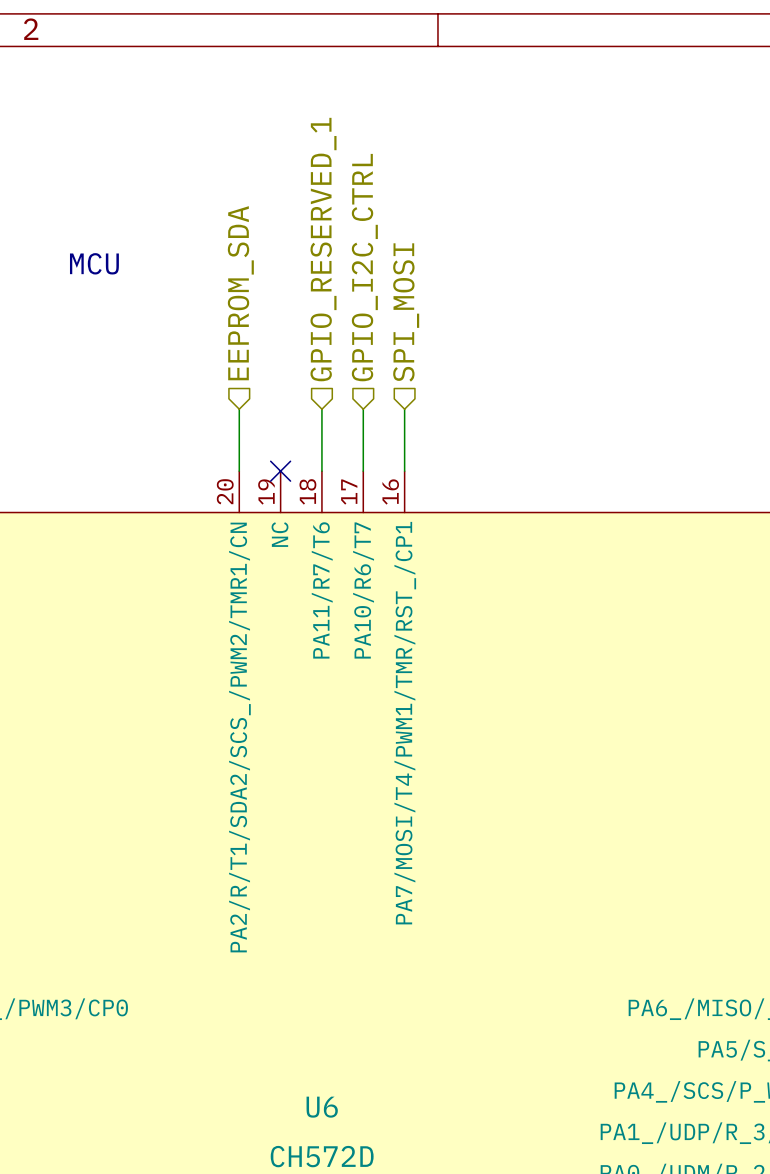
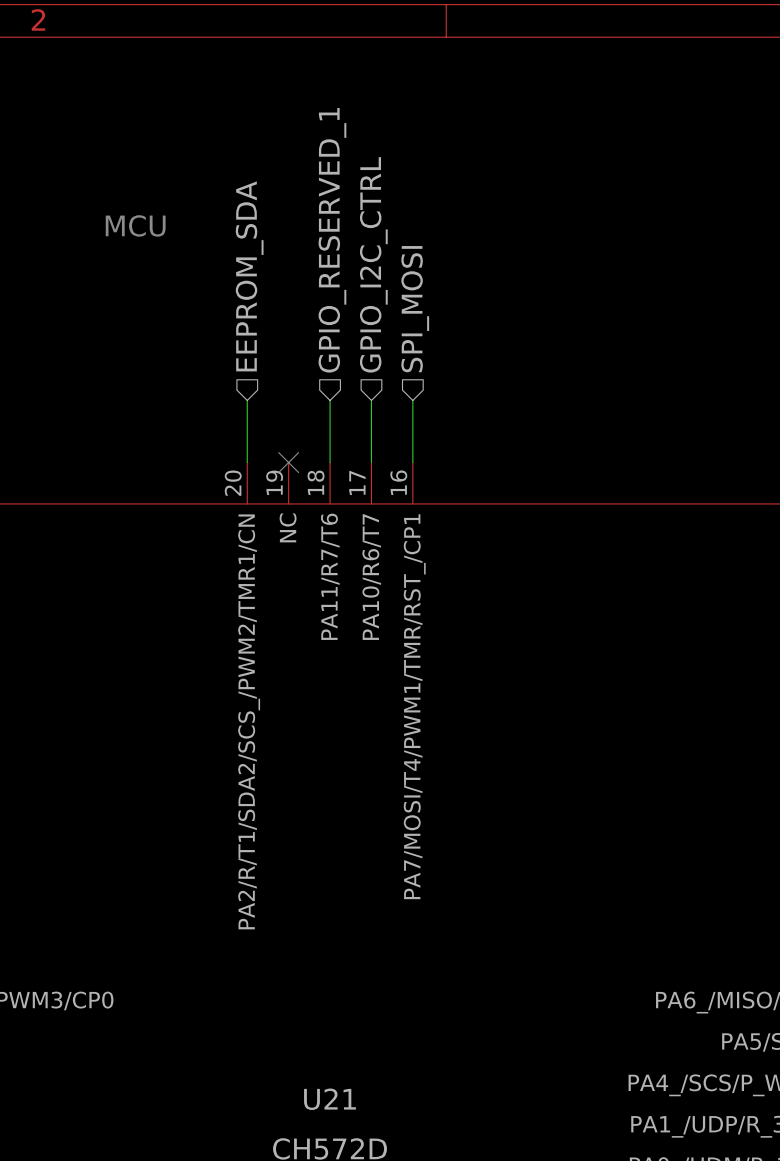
text position: MCU (94, 263) -> MCU (135, 225)
U6 name: U6 (322, 1107) -> U21 (329, 1099)

